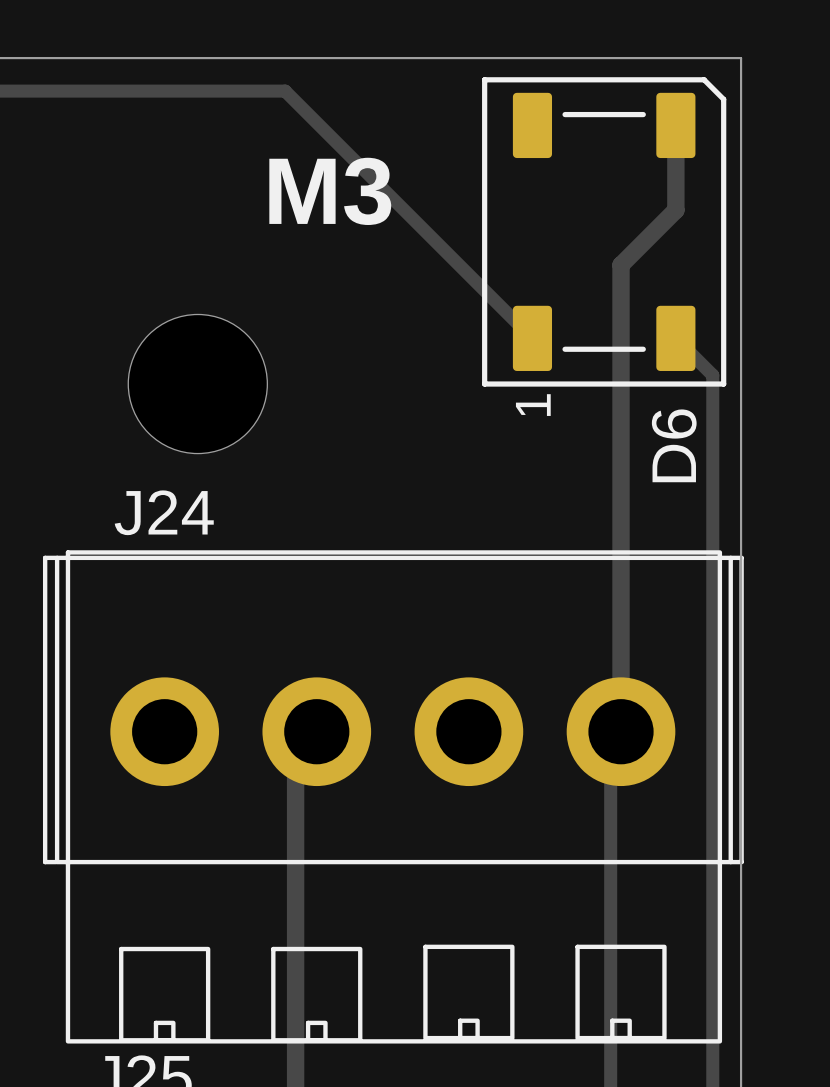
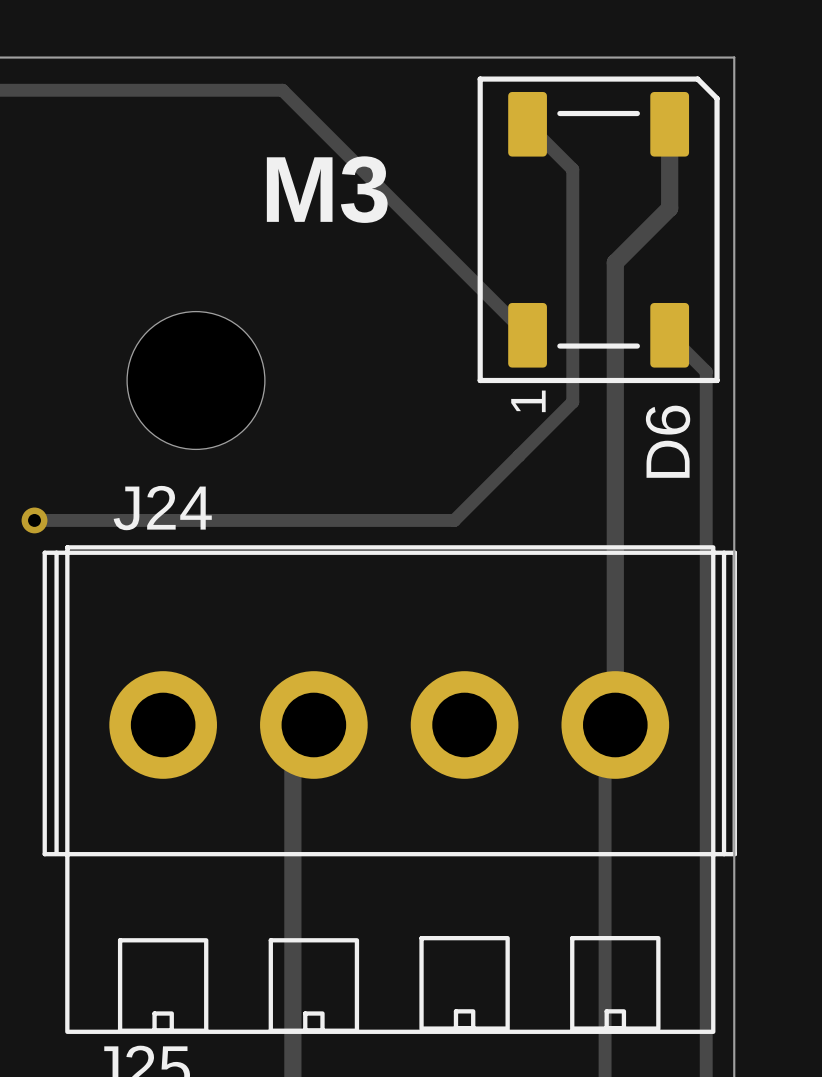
track: none -> (527, 124) (572, 169) (572, 402) (454, 520) (34, 520)
via: none -> (34, 520)

